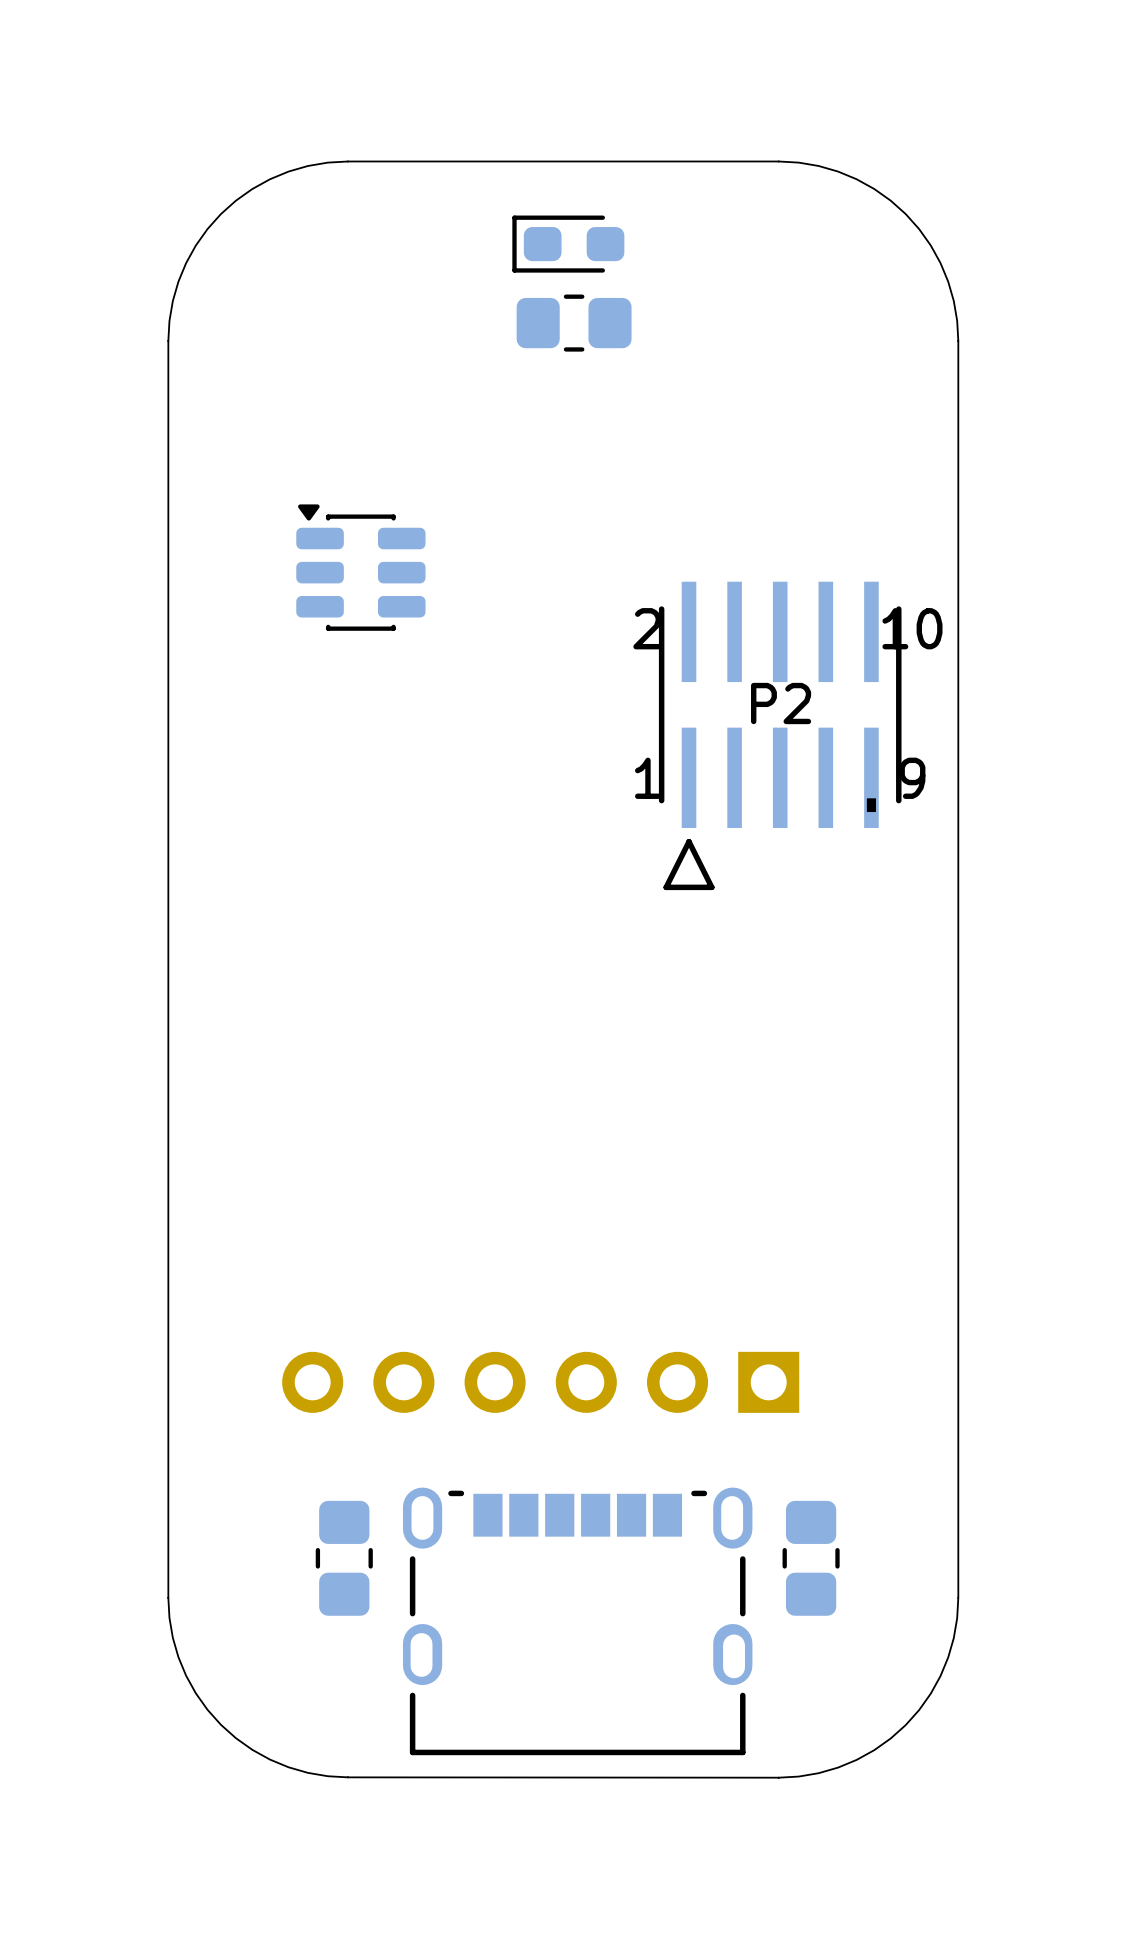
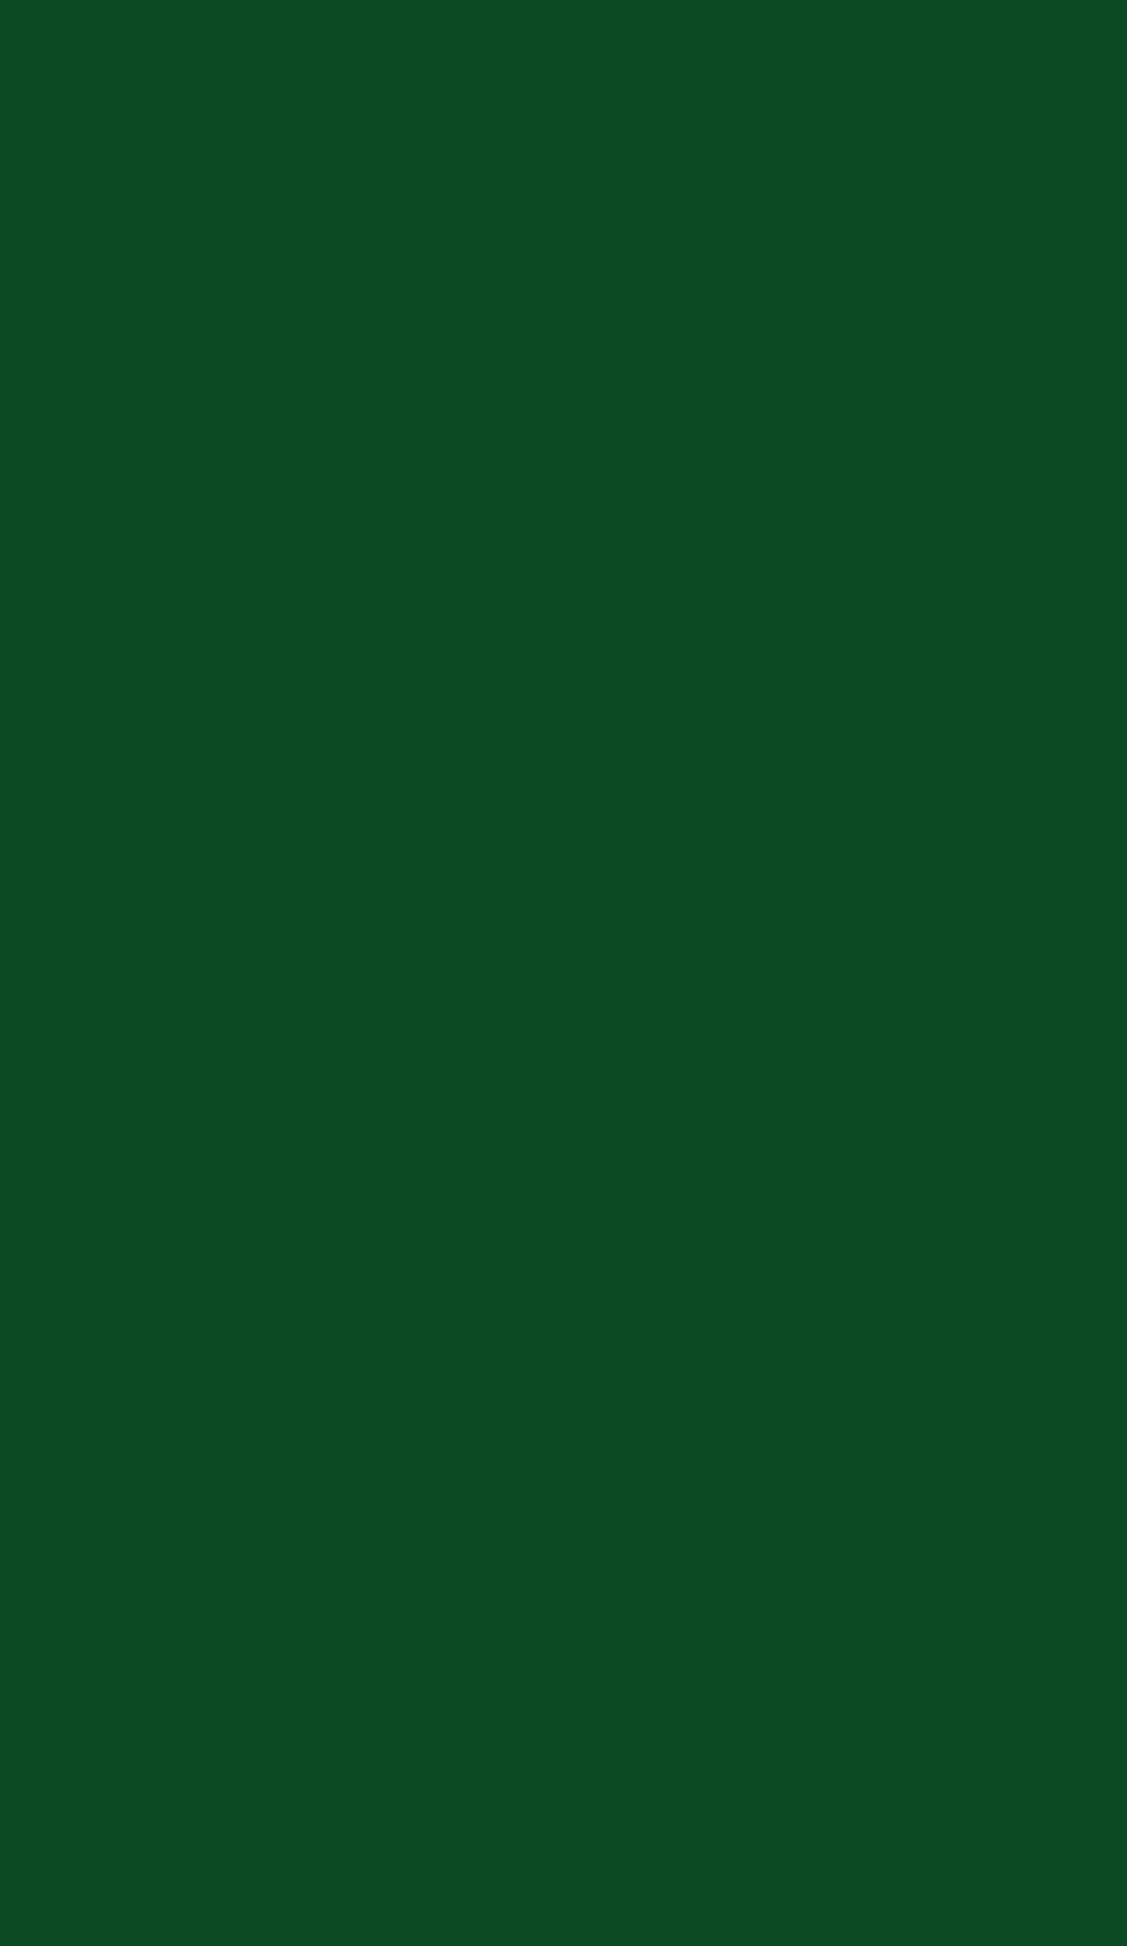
part: (568, 244) -> none
part: (574, 323) -> none
part: (360, 567) -> none
P2: (780, 735) -> none
part: (540, 1382) -> none
part: (344, 1558) -> none
part: (811, 1558) -> none
board edge: (958, 1597) (958, 341) (953, 301) (940, 263) (919, 229) (890, 200) (856, 179) (838, 171) (798, 162) (347, 161) (307, 165) (269, 179) (235, 200) (220, 214) (195, 245) (186, 263) (172, 301) (168, 341) (168, 1597) (172, 1637) (186, 1675) (207, 1709) (235, 1738) (269, 1759) (307, 1772) (327, 1776) (798, 1776) (838, 1767) (856, 1759) (890, 1738) (905, 1725) (930, 1693) (940, 1676) (953, 1638) (958, 1598) -> none
part: (577, 1621) -> none

